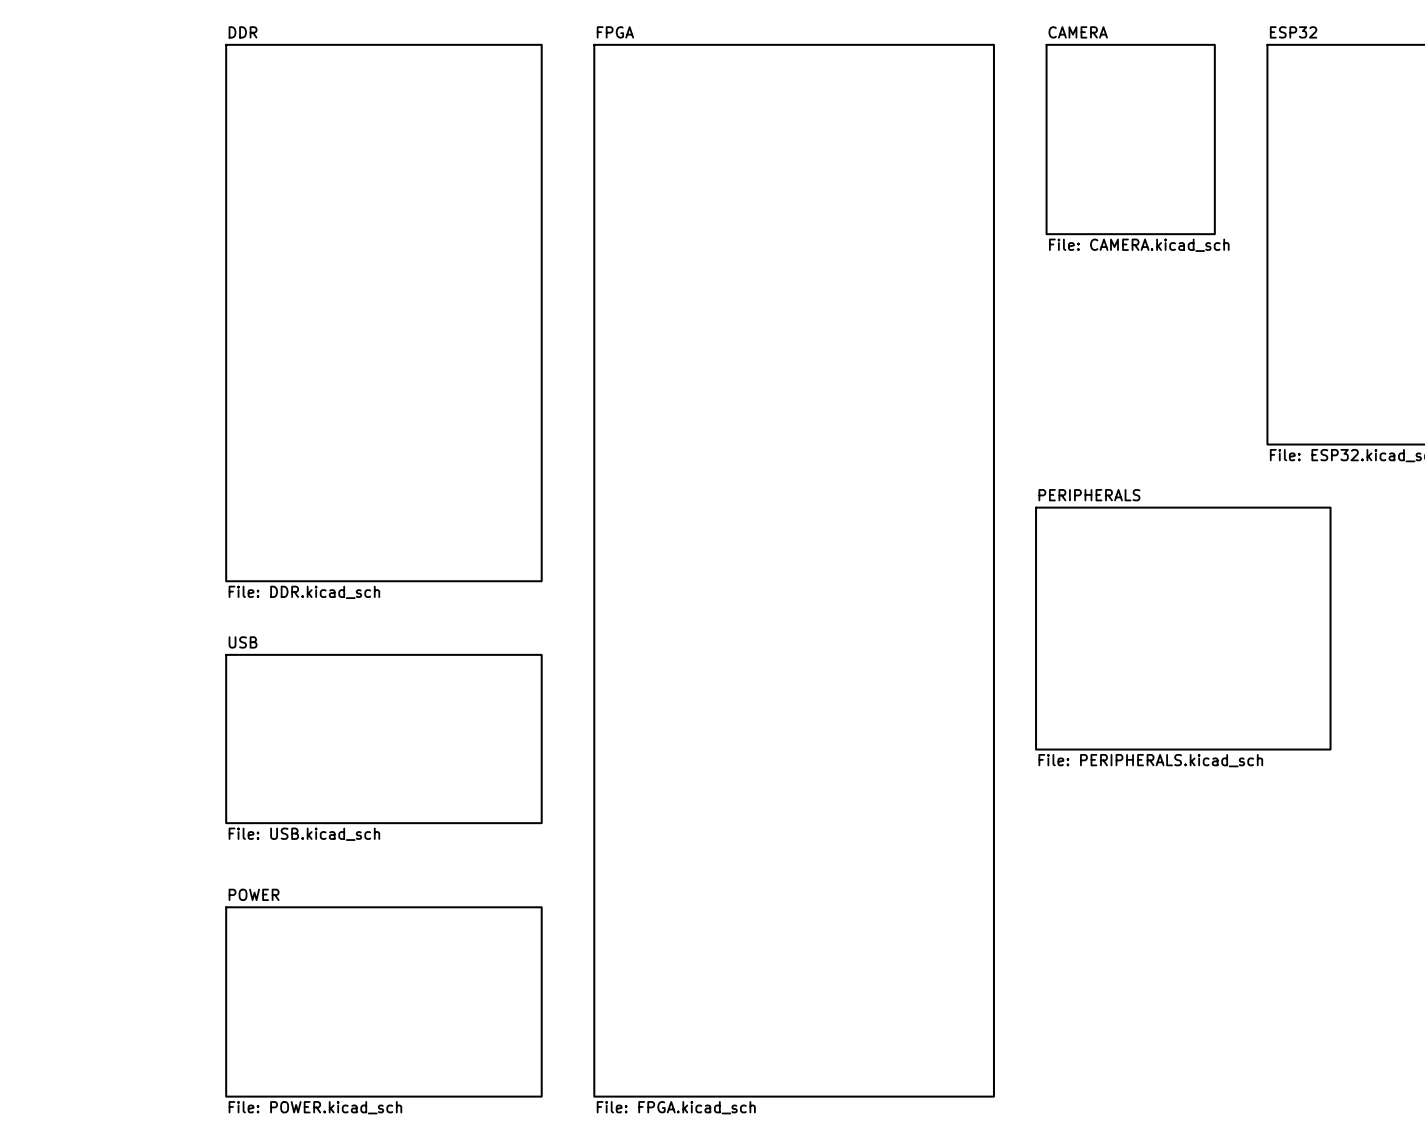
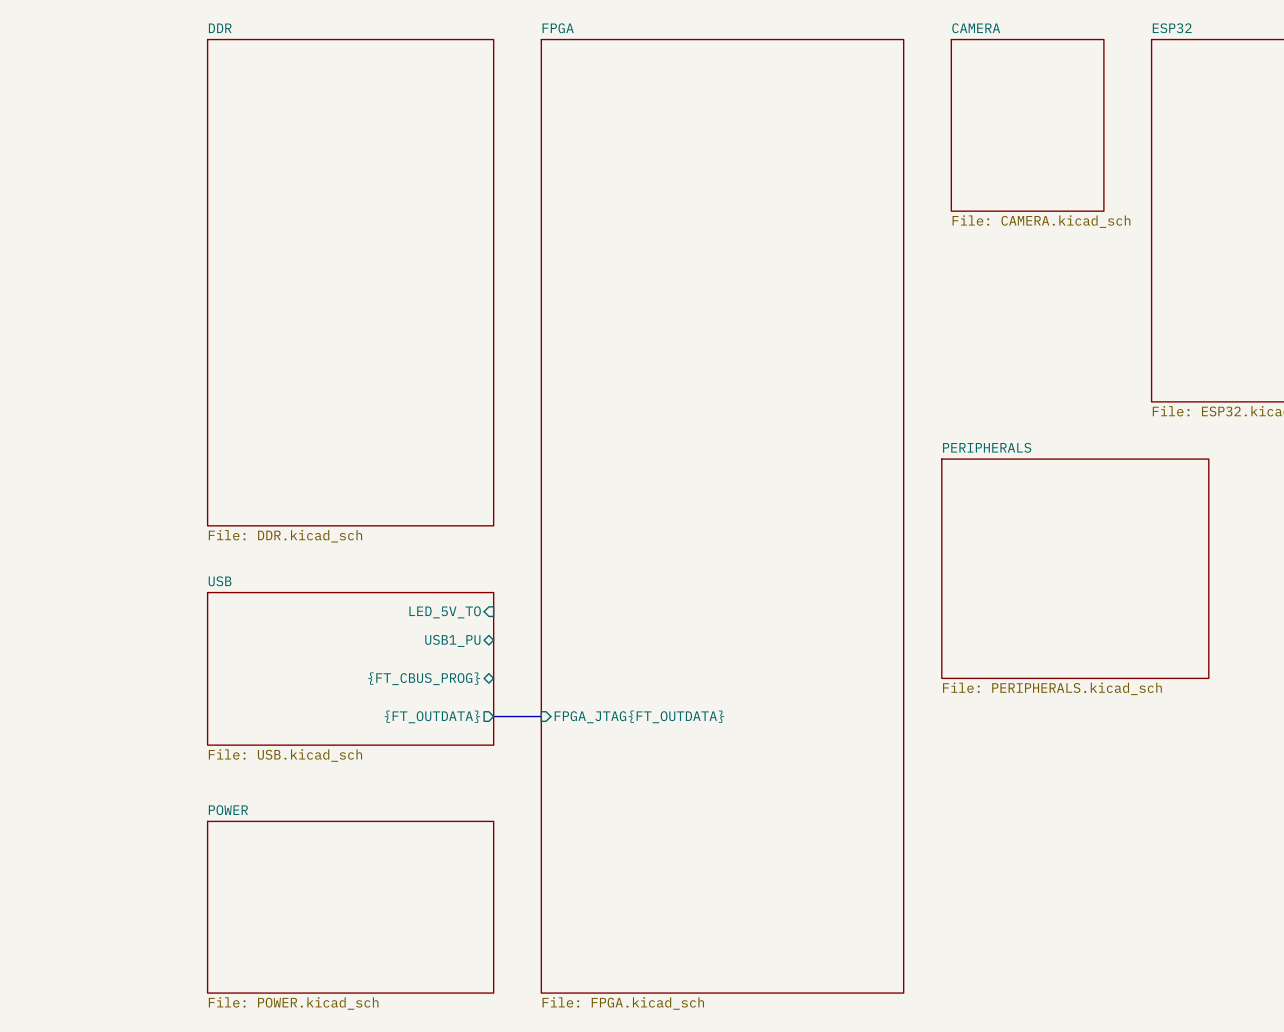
sheet pin: none -> LED_5V_TO (445, 612)
sheet pin: none -> USB1_PU (452, 640)
sheet pin: none -> {FT_CBUS_PROG} (424, 678)
bus: none -> (493, 716) (541, 716)
sheet pin: none -> {FT_OUTDATA} (432, 716)
sheet pin: none -> FPGA_JTAG{FT_OUTDATA} (639, 716)

